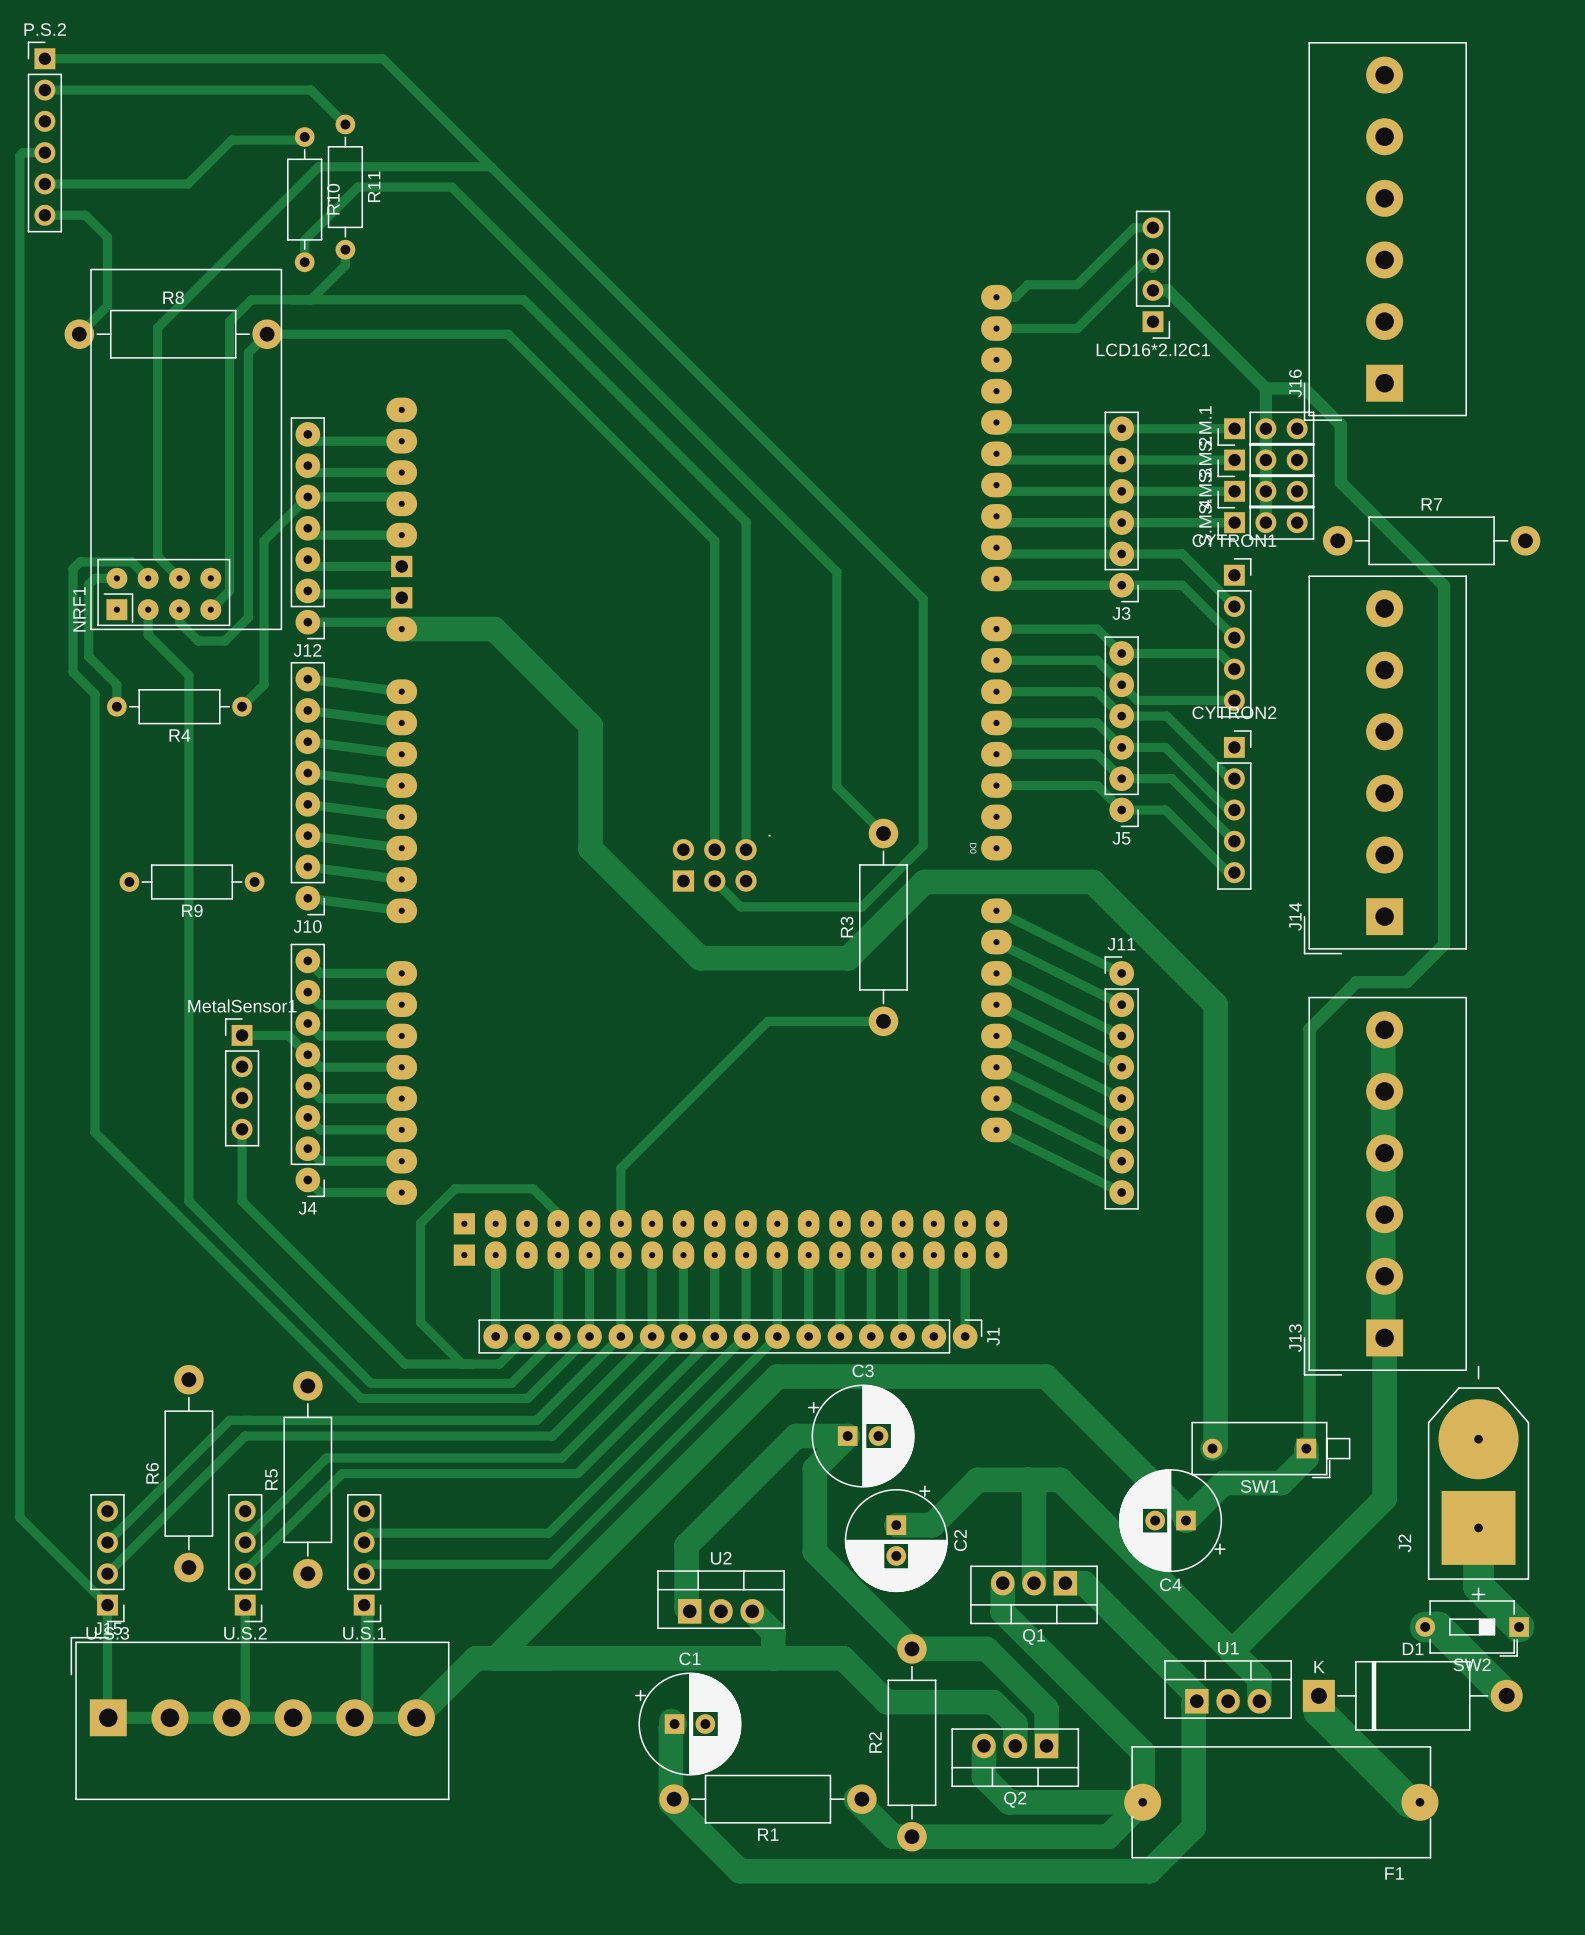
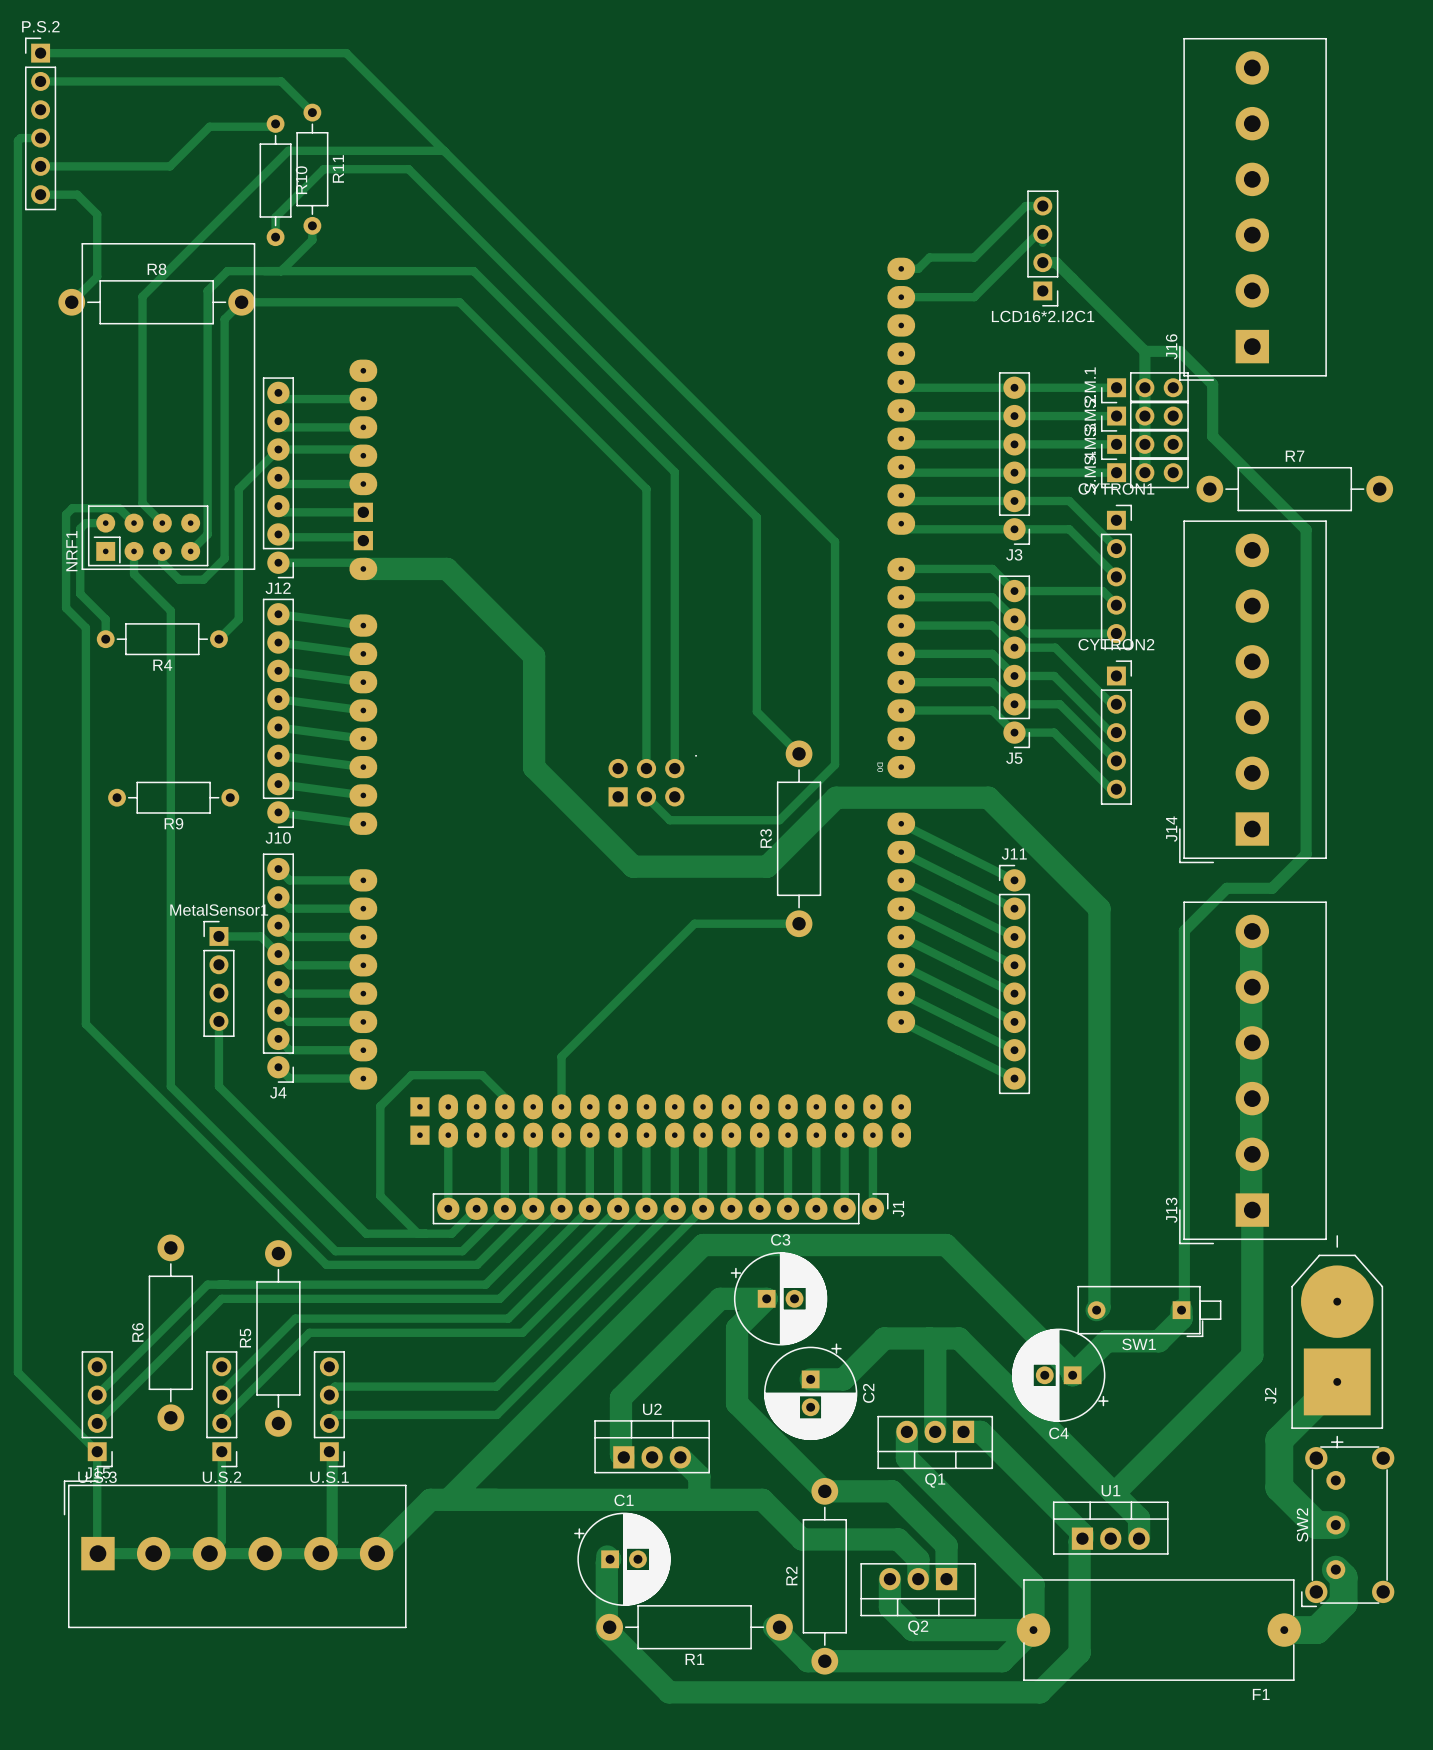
track: (1478, 1527) (1478, 1586) (1519, 1627) -> (1337, 1381) (1279, 1439) (1279, 1487) (1316, 1525) (1335, 1525)
SW2 footprint: [1415, 1600, 1529, 1657] -> [1301, 1446, 1395, 1608]
track: (1425, 1627) (1437, 1627) (1506, 1695) -> none
SW2 name position: SW2 (1472, 1664) -> SW2 (1302, 1525)
track: (1318, 1695) (1318, 1711) (1409, 1802) (1419, 1802) -> (1335, 1569) (1343, 1577) (1343, 1603) (1316, 1630) (1284, 1630)
D1: (1412, 1695) -> none

